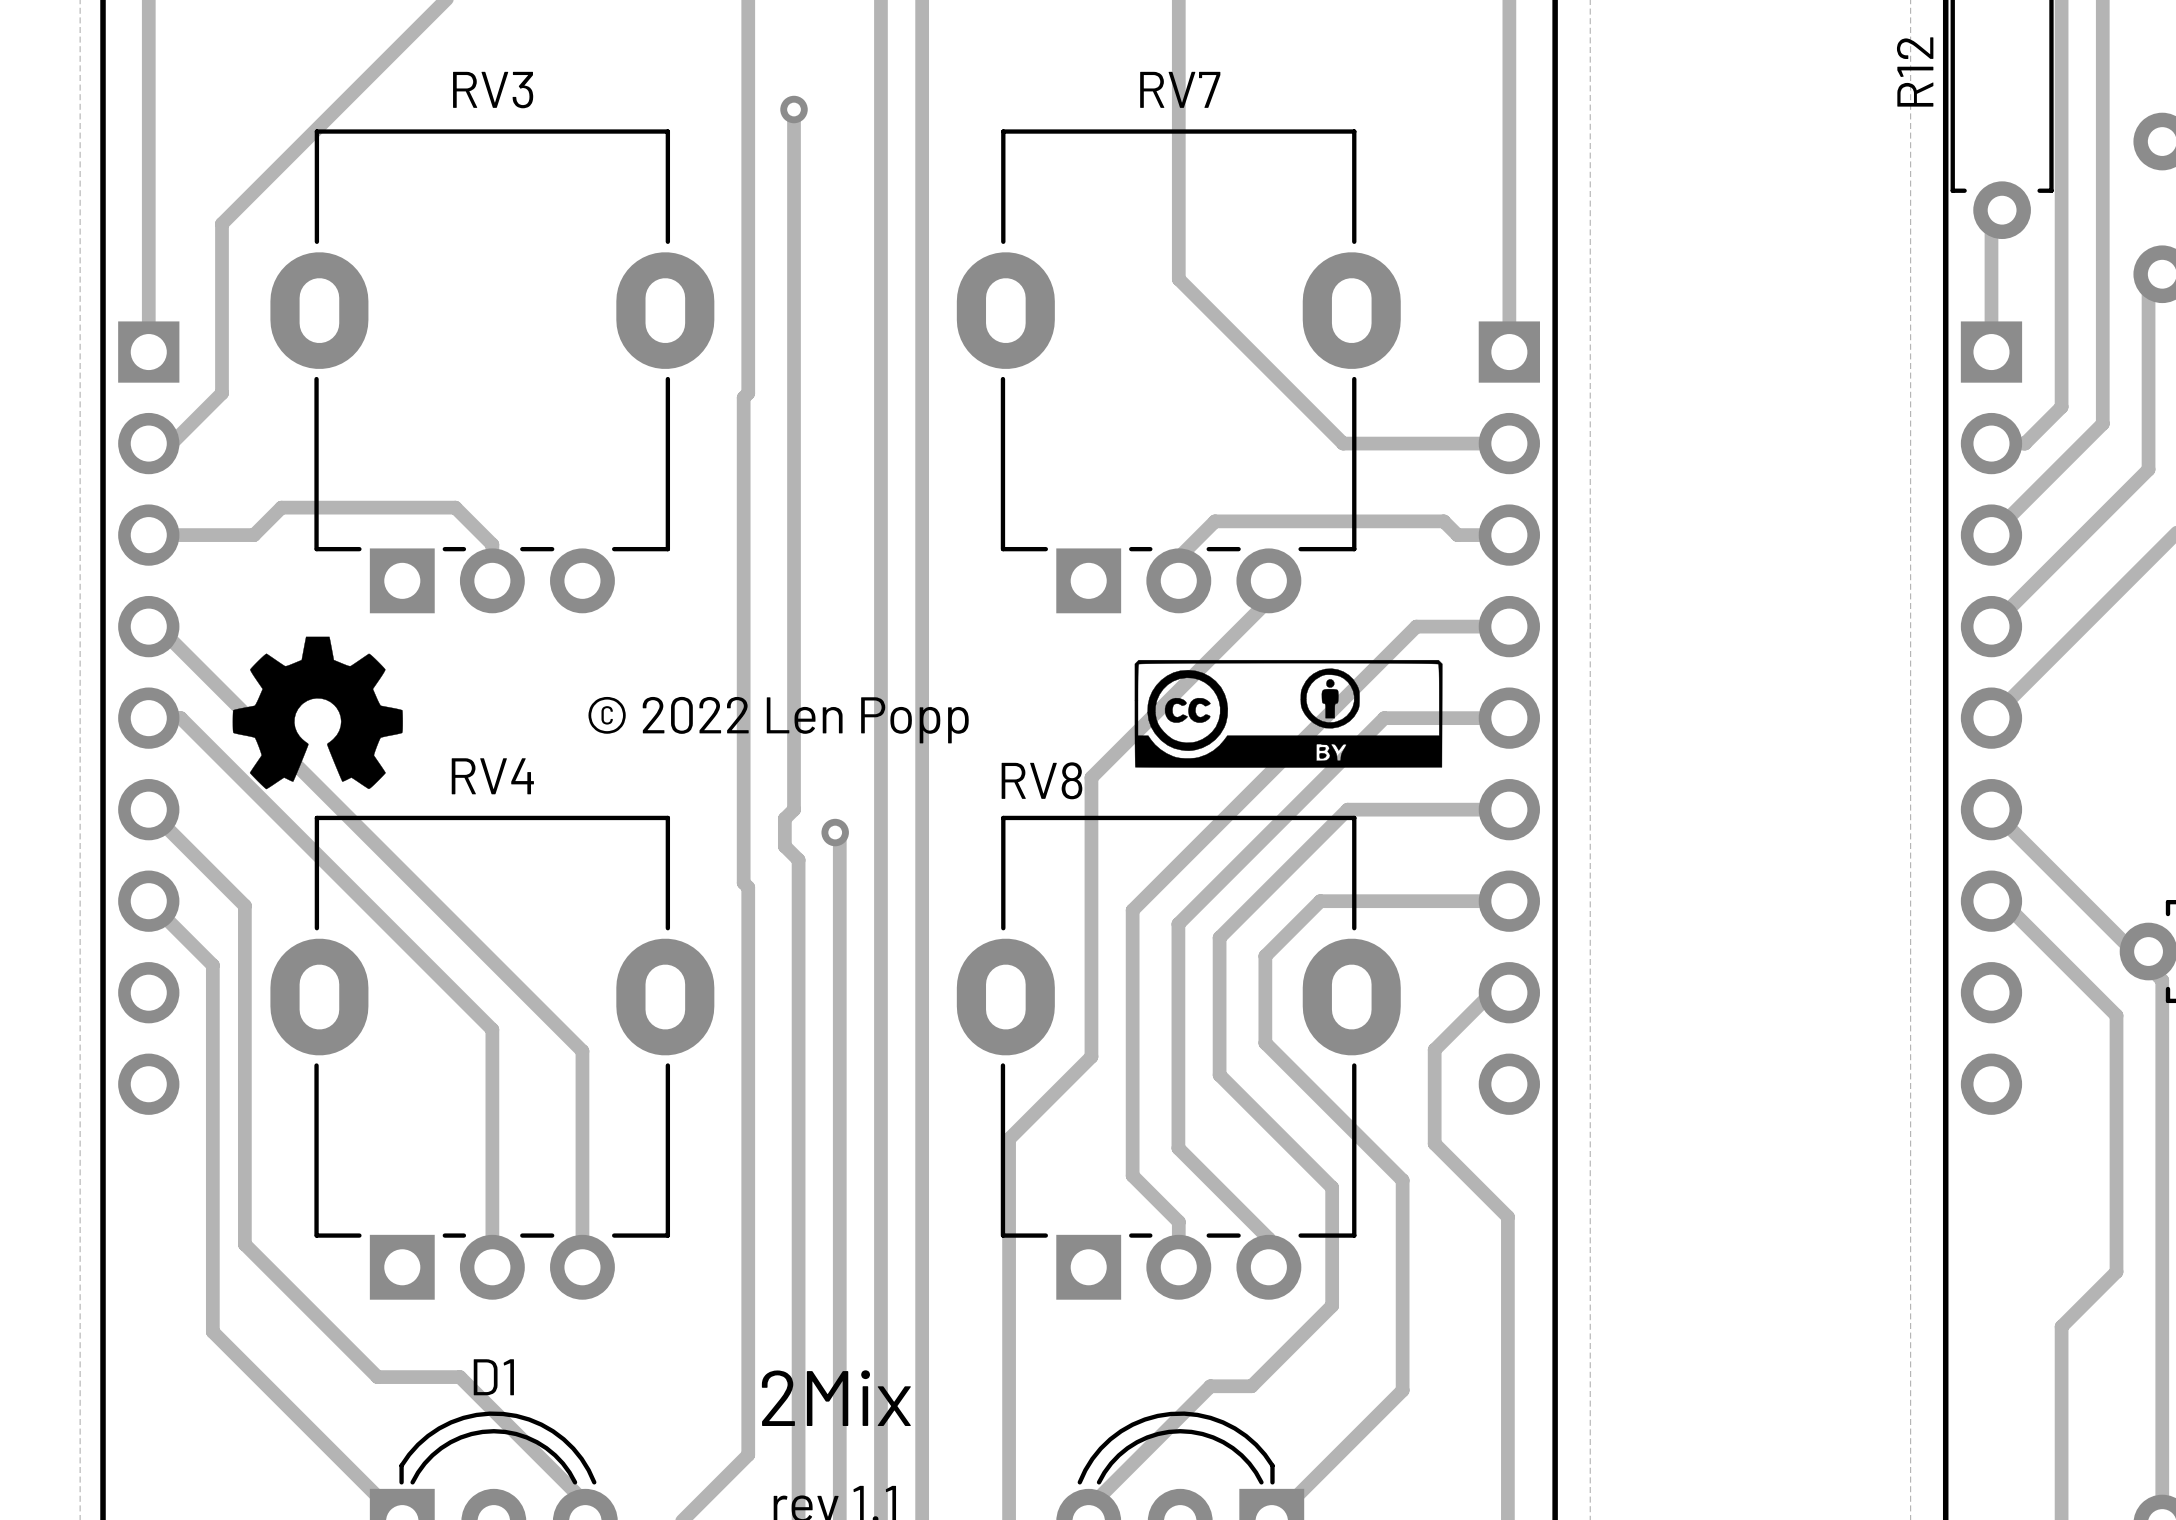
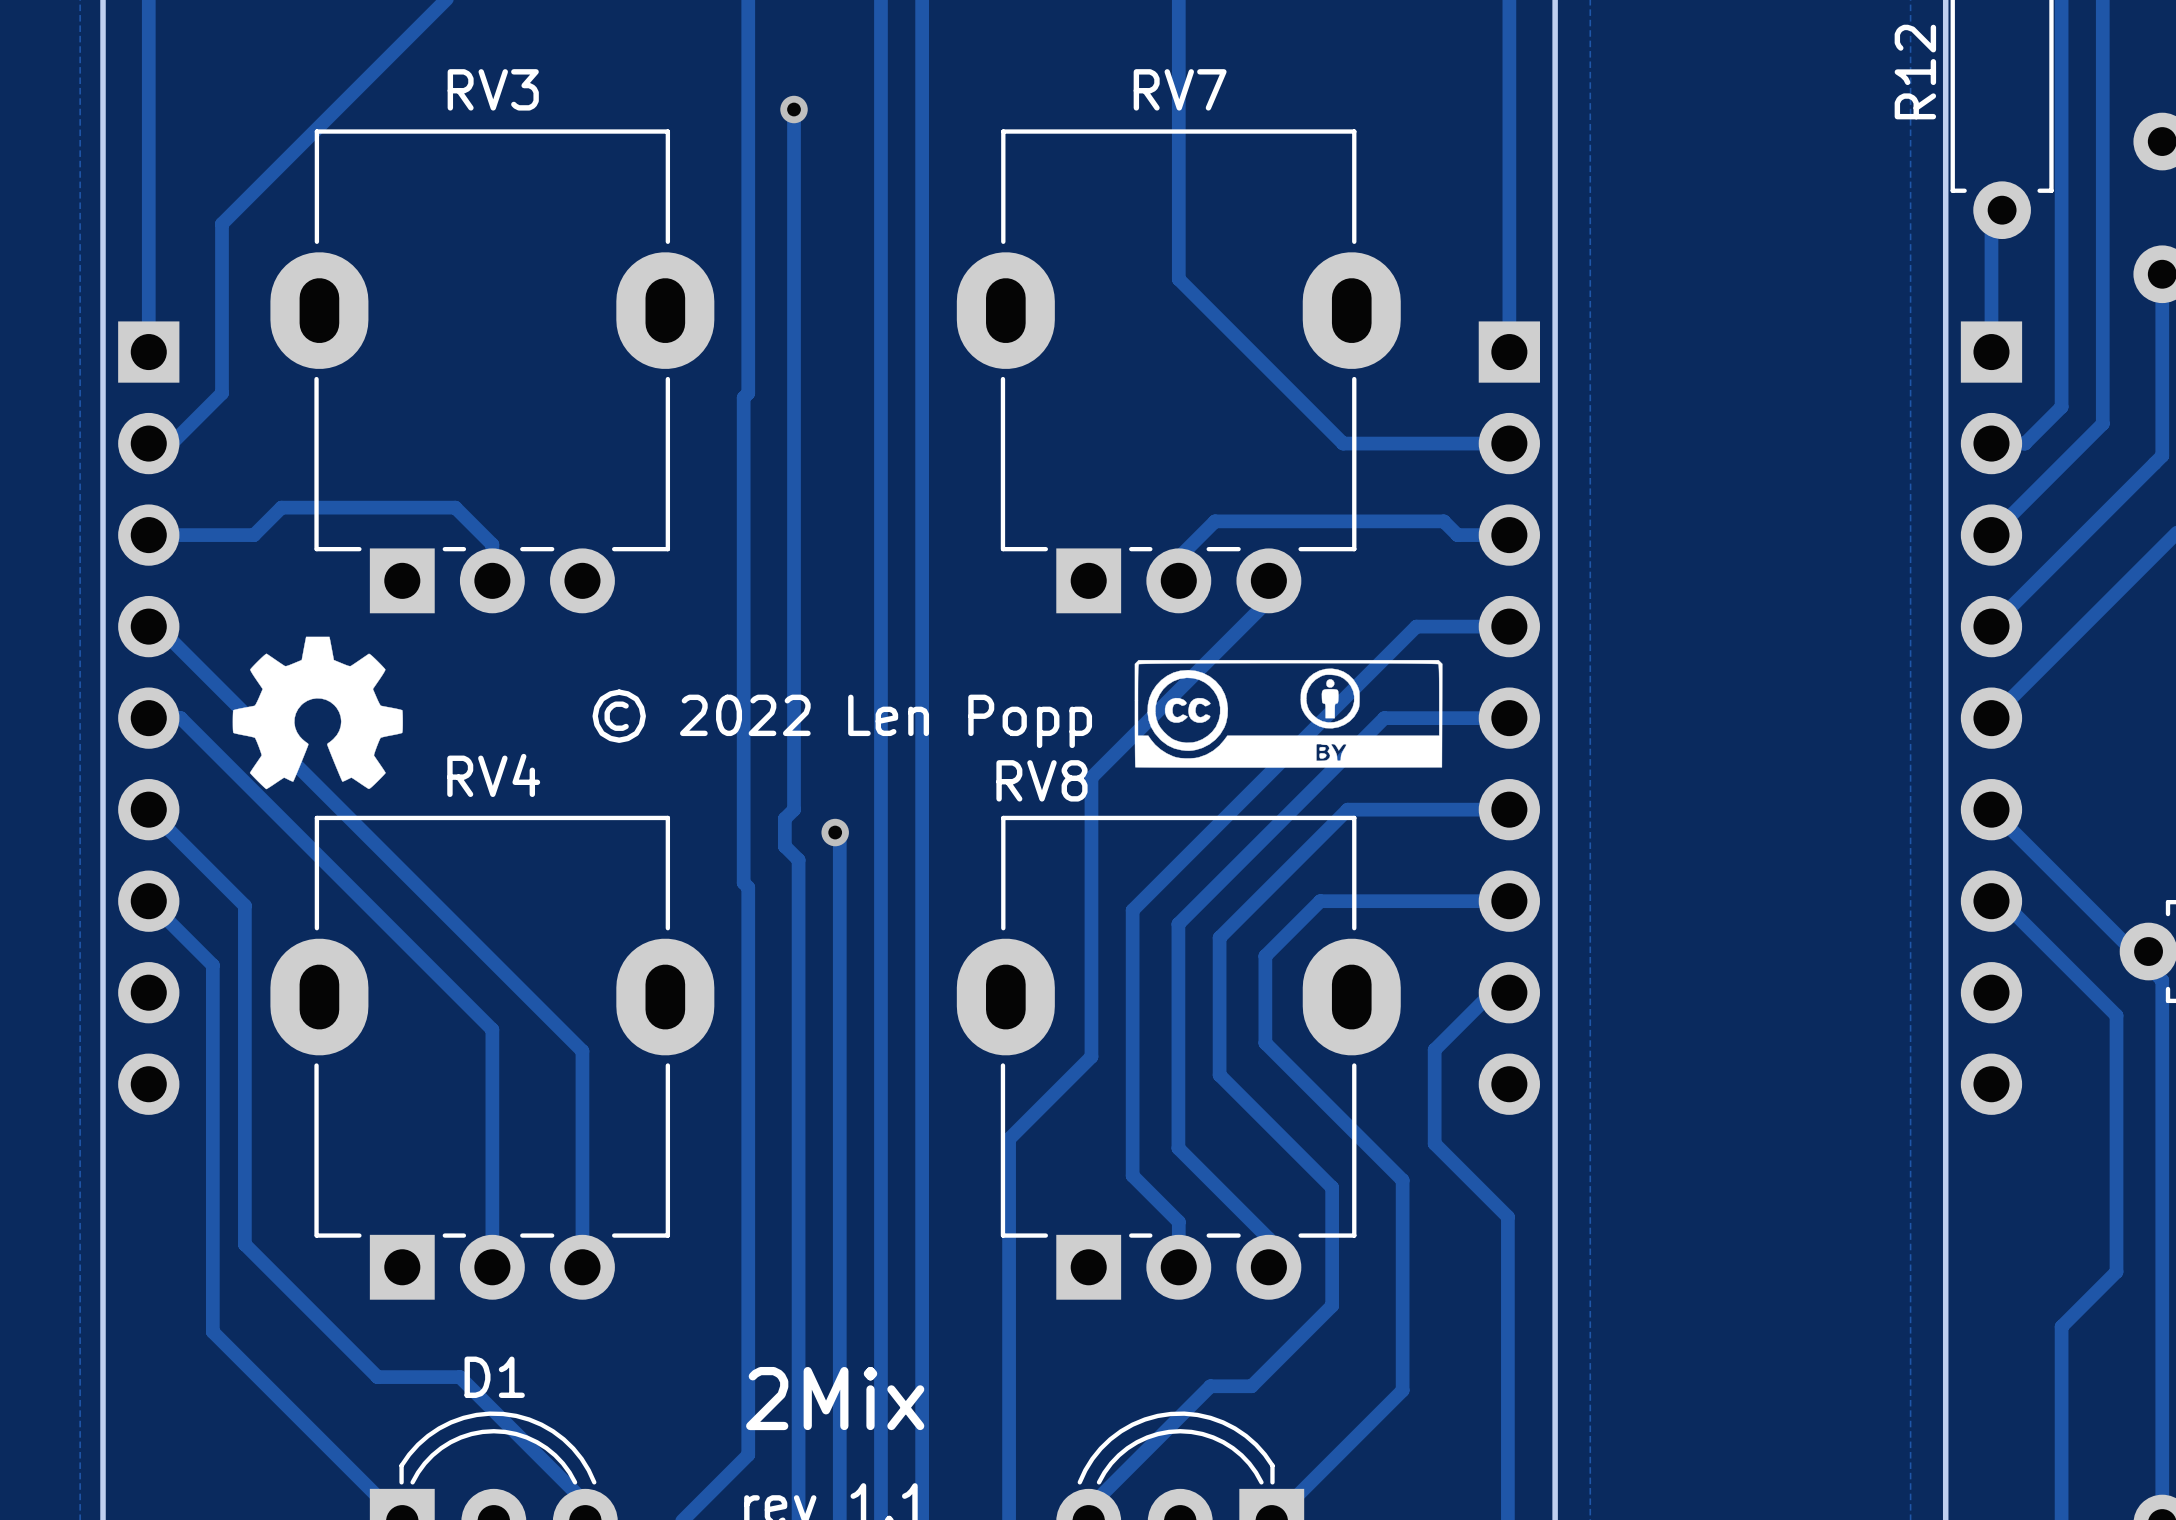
track: (2148, 287) (2148, 469) -> (2162, 274) (2162, 455) (2148, 469)

